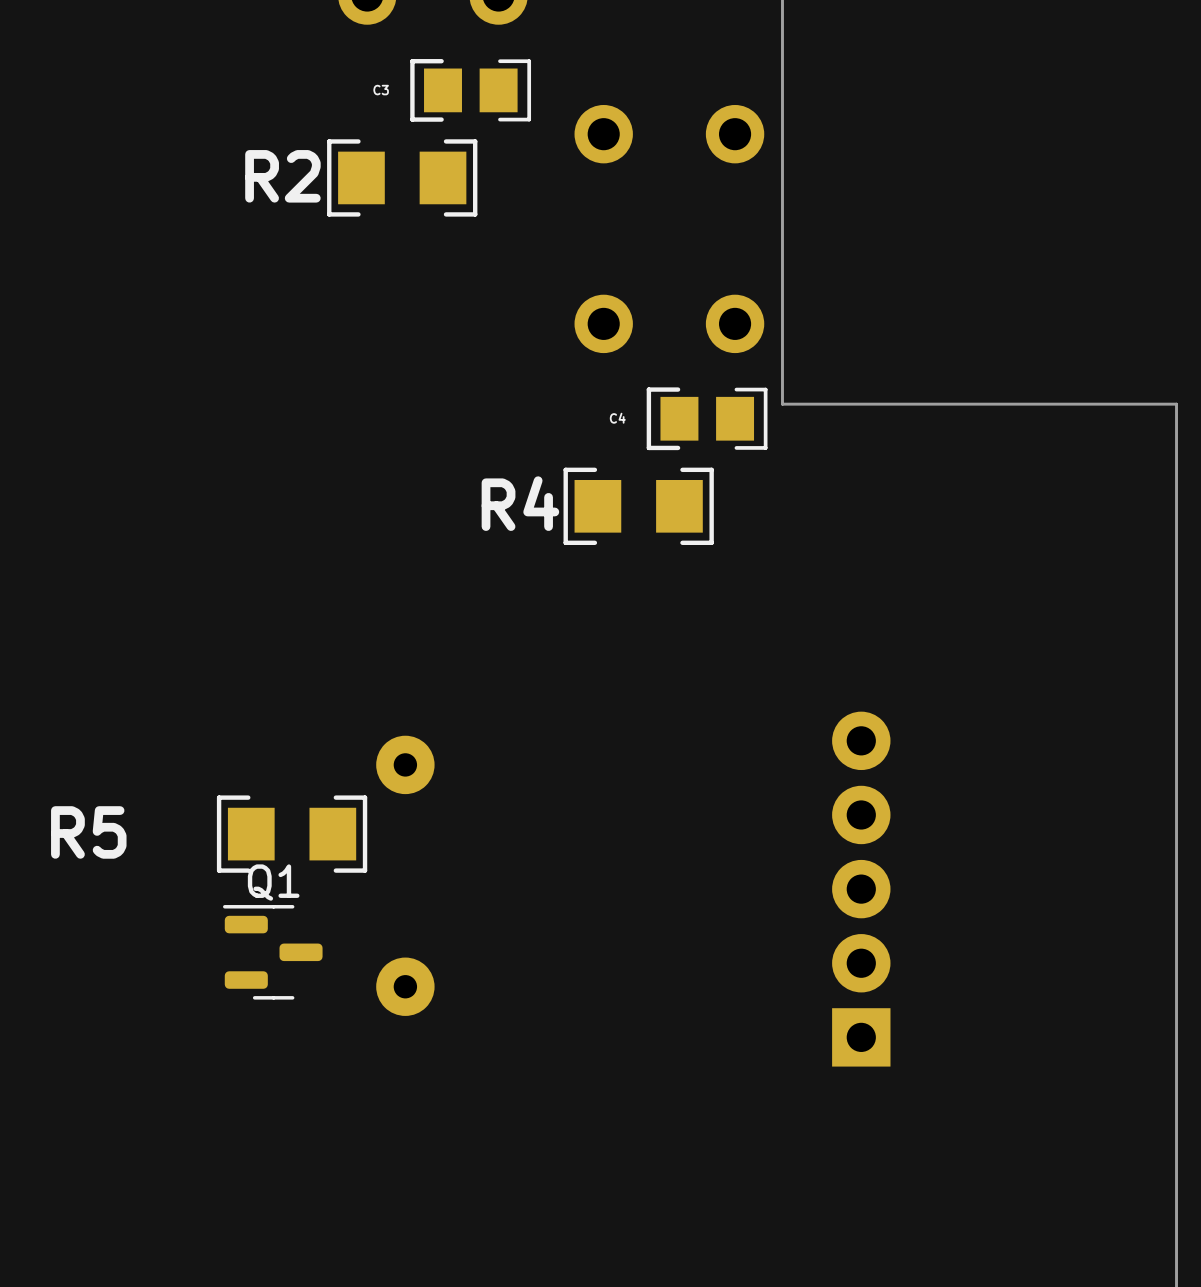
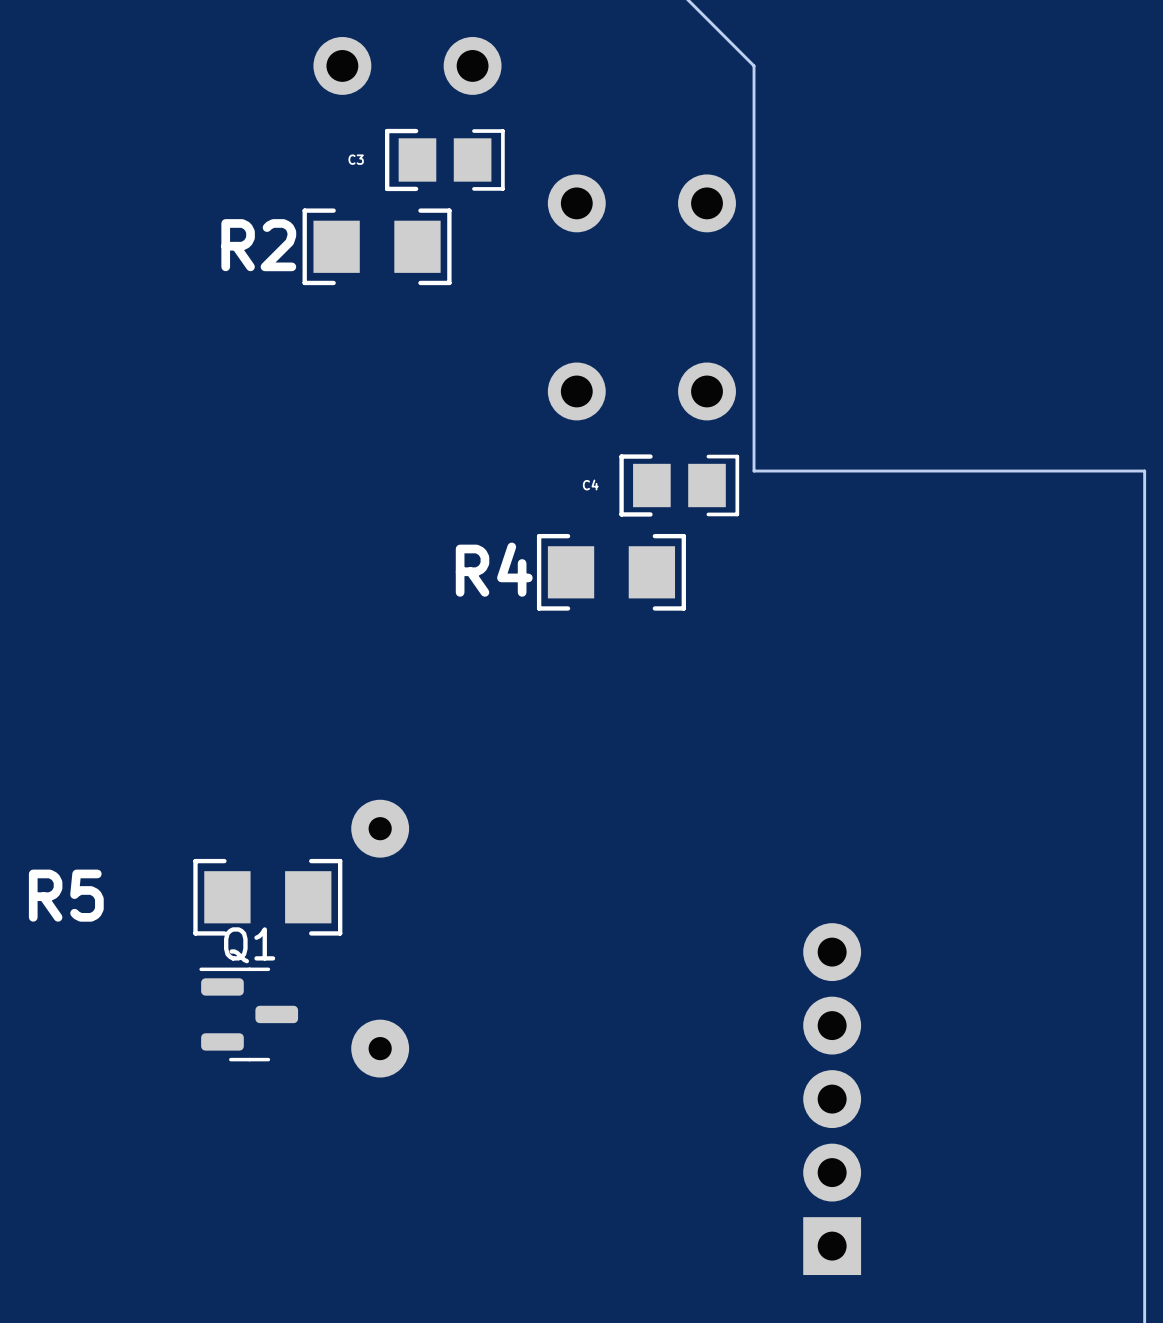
part position: (861, 889) -> (832, 1099)

